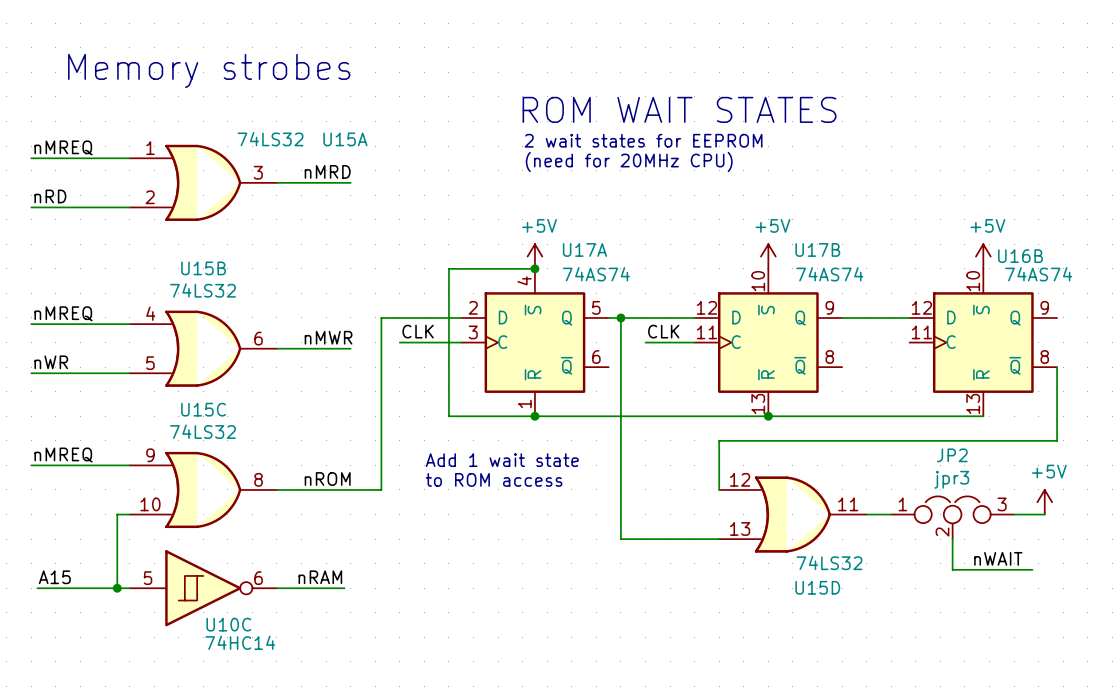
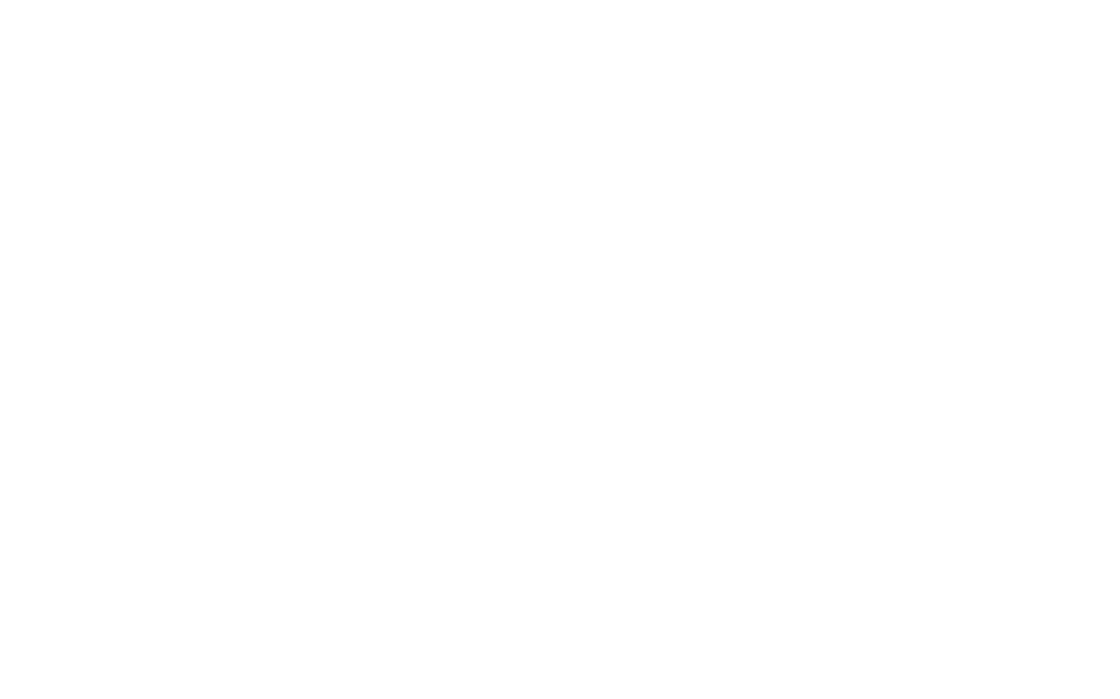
text: Memory strobes (209, 70) -> none
text: ROM WAIT STATES (679, 109) -> none
text: 2 wait states for EEPROM (643, 140) -> none
label: nMREQ (63, 147) -> none
wire: (31, 158) (129, 158) -> none
text: (need for 20MHz CPU) (629, 161) -> none
label: nMRD (327, 171) -> none
U15A: 74LS32 (203, 182) -> none
wire: (276, 182) (350, 182) -> none
label: nRD (50, 196) -> none
wire: (31, 207) (129, 207) -> none
power symbol: +5V (534, 256) -> none
power symbol: +5V (768, 256) -> none
power symbol: +5V (983, 256) -> none
wire: (534, 268) (448, 268) (448, 416) (983, 416) -> none
junction: (534, 268) -> none
label: nMREQ (63, 313) -> none
wire: (461, 317) (381, 317) (381, 489) (276, 489) -> none
wire: (608, 317) (694, 317) -> none
wire: (620, 317) (620, 539) (719, 539) -> none
junction: (620, 317) -> none
wire: (842, 317) (909, 317) -> none
wire: (31, 324) (129, 324) -> none
label: CLK (418, 331) -> none
label: CLK (663, 331) -> none
label: nMWR (328, 337) -> none
wire: (399, 342) (461, 342) -> none
U17A: 74AS74 (534, 342) -> none
wire: (645, 342) (694, 342) -> none
U17B: 74AS74 (768, 342) -> none
U16B: 74AS74 (983, 342) -> none
U15B: 74LS32 (203, 348) -> none
wire: (276, 348) (350, 348) -> none
label: nWR (51, 362) -> none
wire: (1057, 367) (1057, 440) (719, 440) (719, 489) -> none
wire: (31, 373) (129, 373) -> none
junction: (534, 416) -> none
junction: (768, 416) -> none
label: nMREQ (63, 455) -> none
text: Add 1 wait state (502, 460) -> none
wire: (31, 465) (129, 465) -> none
label: nROM (327, 479) -> none
text: to ROM access (494, 479) -> none
U15C: 74LS32 (203, 489) -> none
power symbol: +5V (1044, 502) -> none
wire: (129, 514) (117, 514) (117, 588) -> none
U15D: 74LS32 (792, 514) -> none
wire: (866, 514) (891, 514) -> none
wire: (1014, 514) (1044, 514) -> none
JP2: jpr3 (952, 517) -> none
wire: (952, 539) (952, 569) (1032, 569) -> none
label: nWAIT (998, 558) -> none
label: A15 (54, 577) -> none
label: nRAM (320, 577) -> none
wire: (37, 588) (129, 588) -> none
junction: (117, 588) -> none
U10C: 74HC14 (203, 588) -> none
wire: (276, 588) (344, 588) -> none

